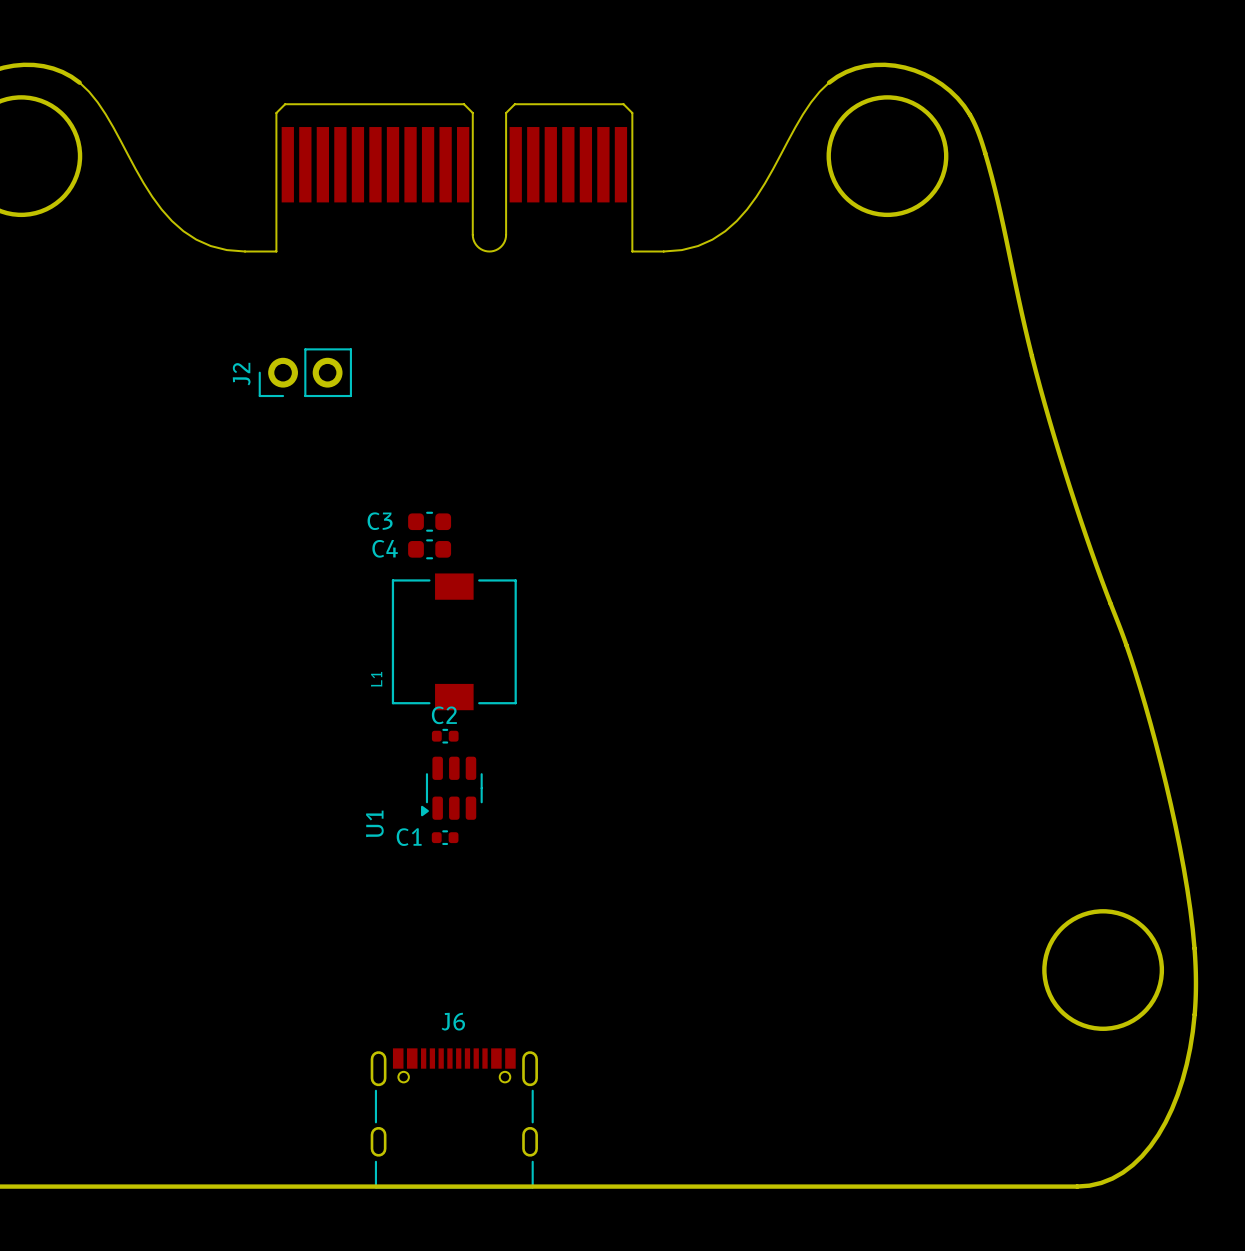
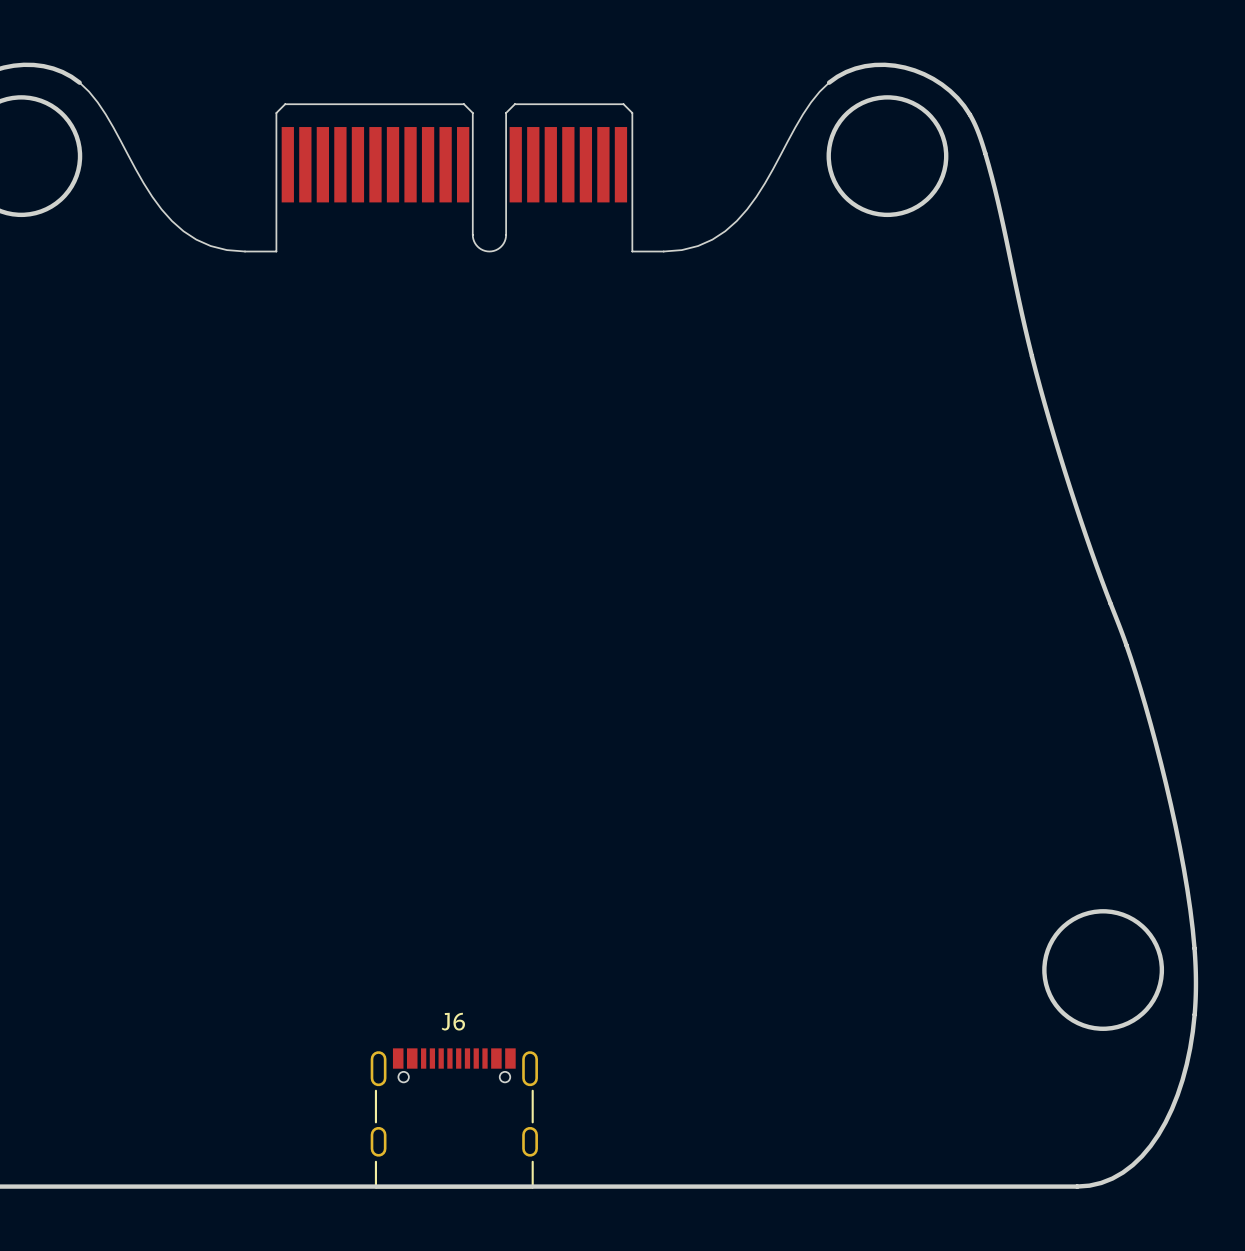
J2: (305, 372) -> none
C3: (429, 521) -> none
C4: (429, 549) -> none
L1: (454, 641) -> none
C2: (445, 736) -> none
U1: (451, 788) -> none
C1: (445, 837) -> none

